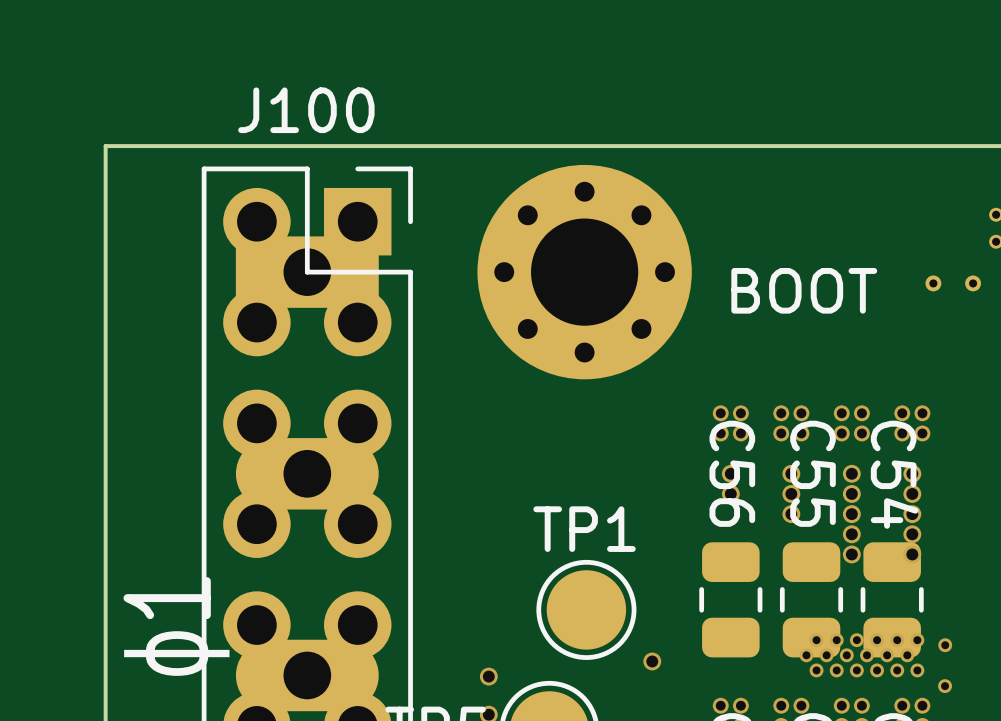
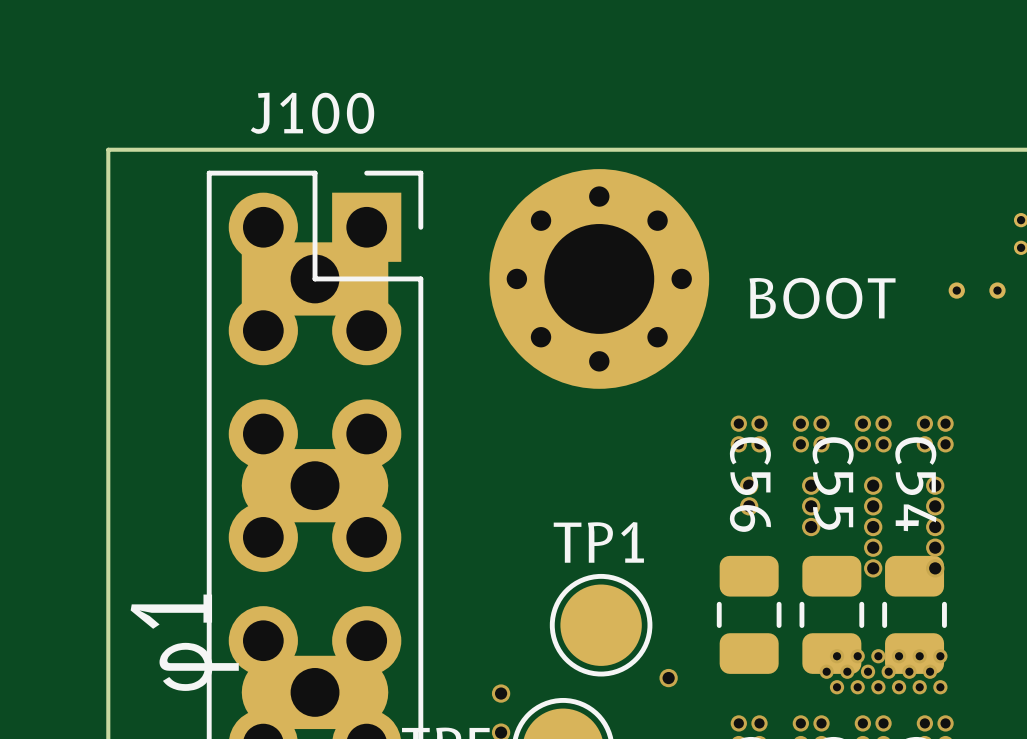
via: (945, 645) -> none
via: (945, 686) -> none

